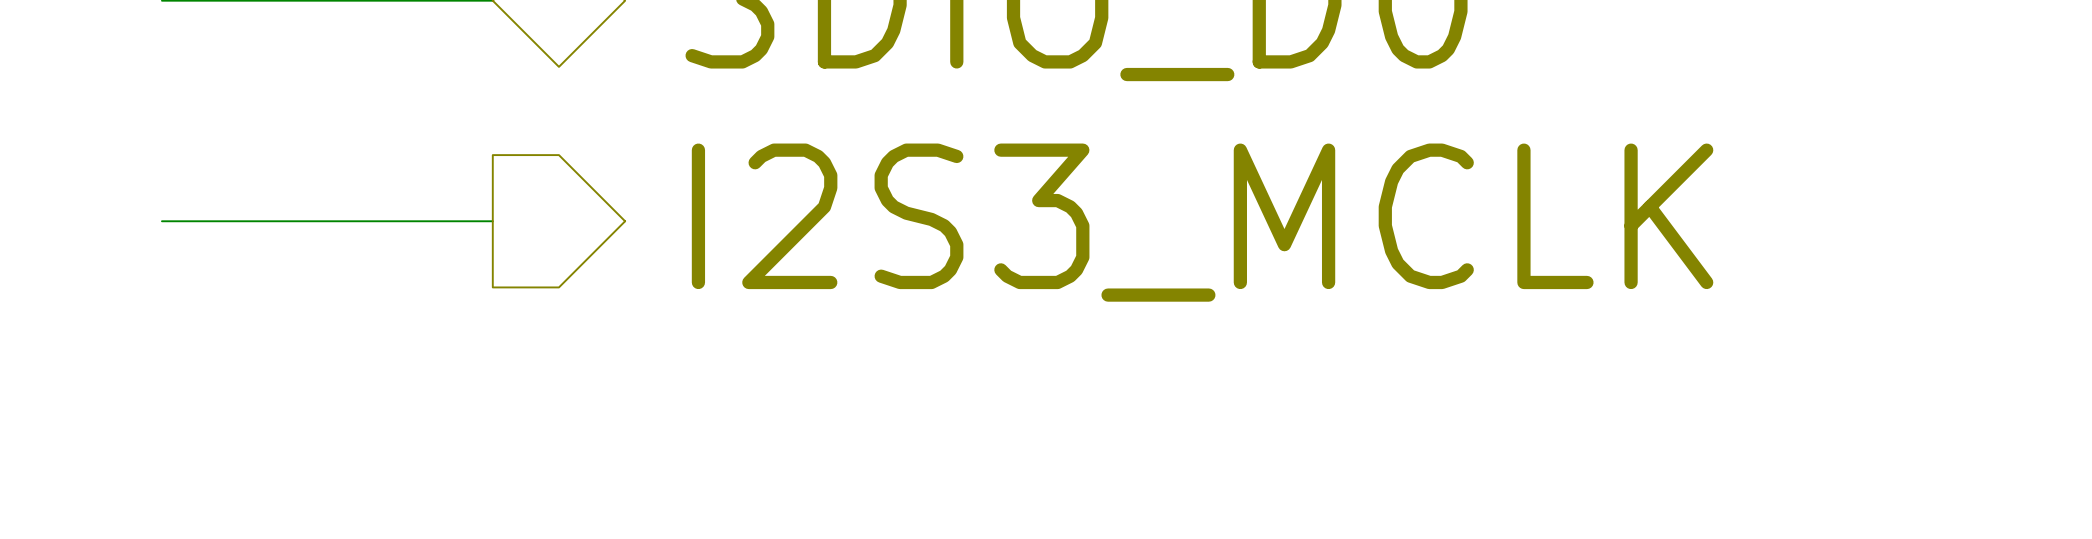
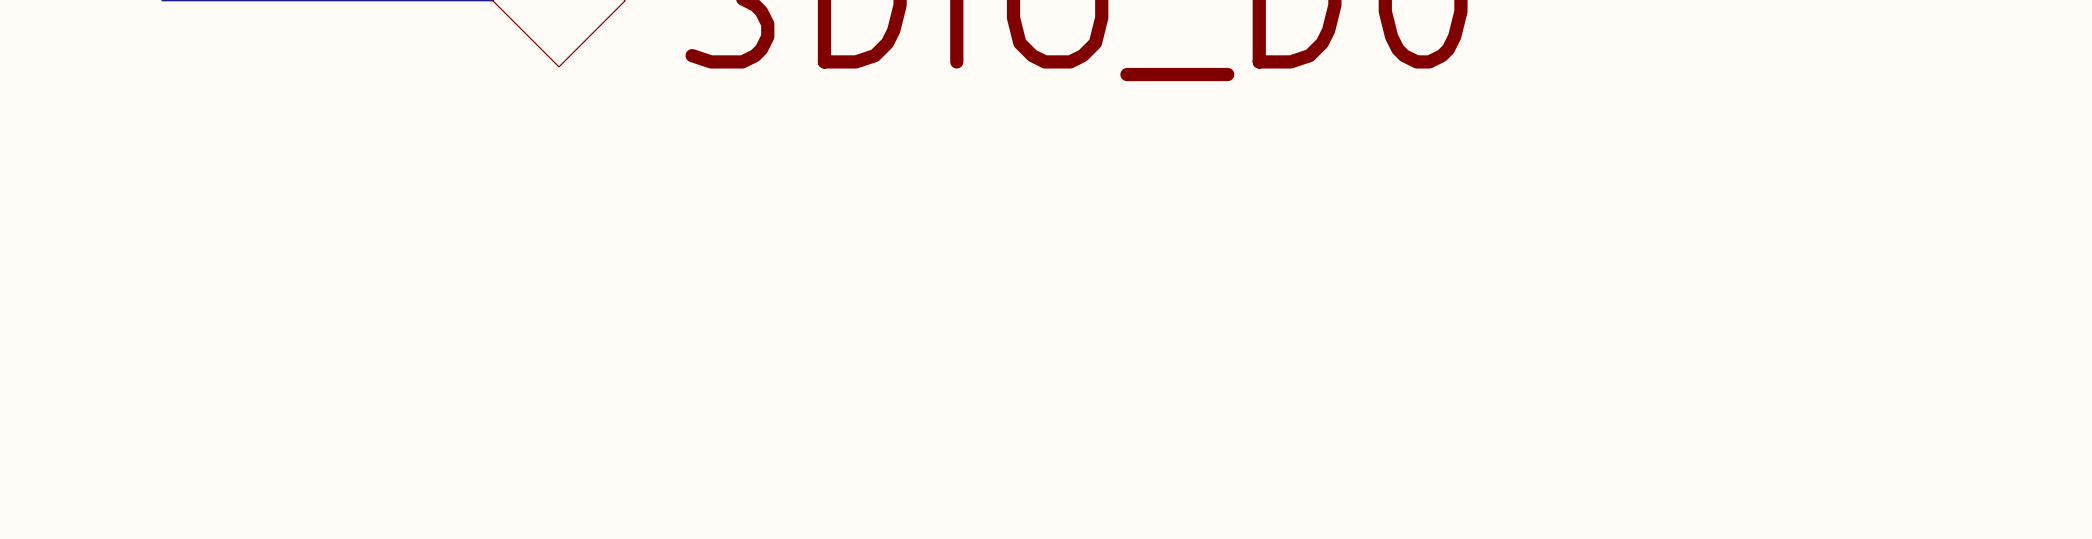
wire: (161, 221) (492, 221) -> none
hierarchical label: I2S3_MCLK (1202, 222) -> none

